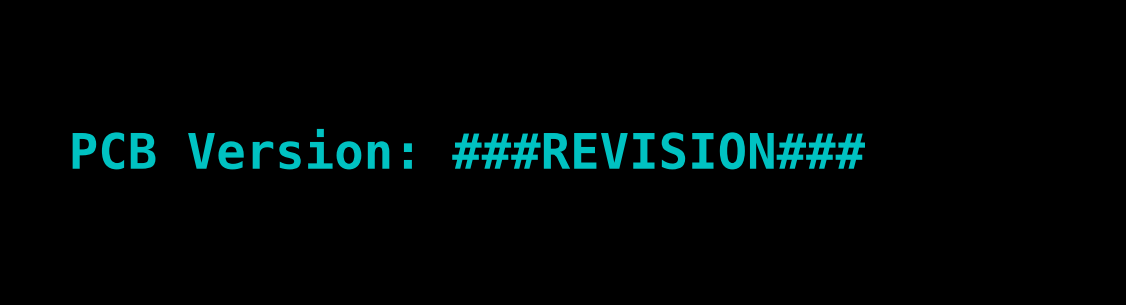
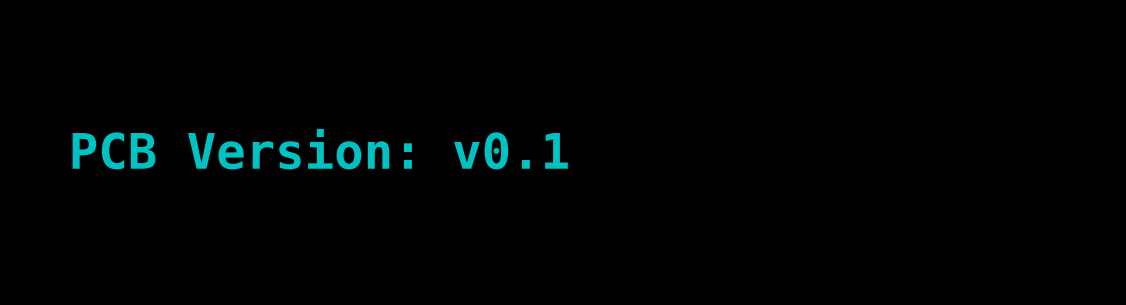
text: PCB Version: ###REVISION### (468, 149) -> PCB Version: v0.1 (320, 149)

